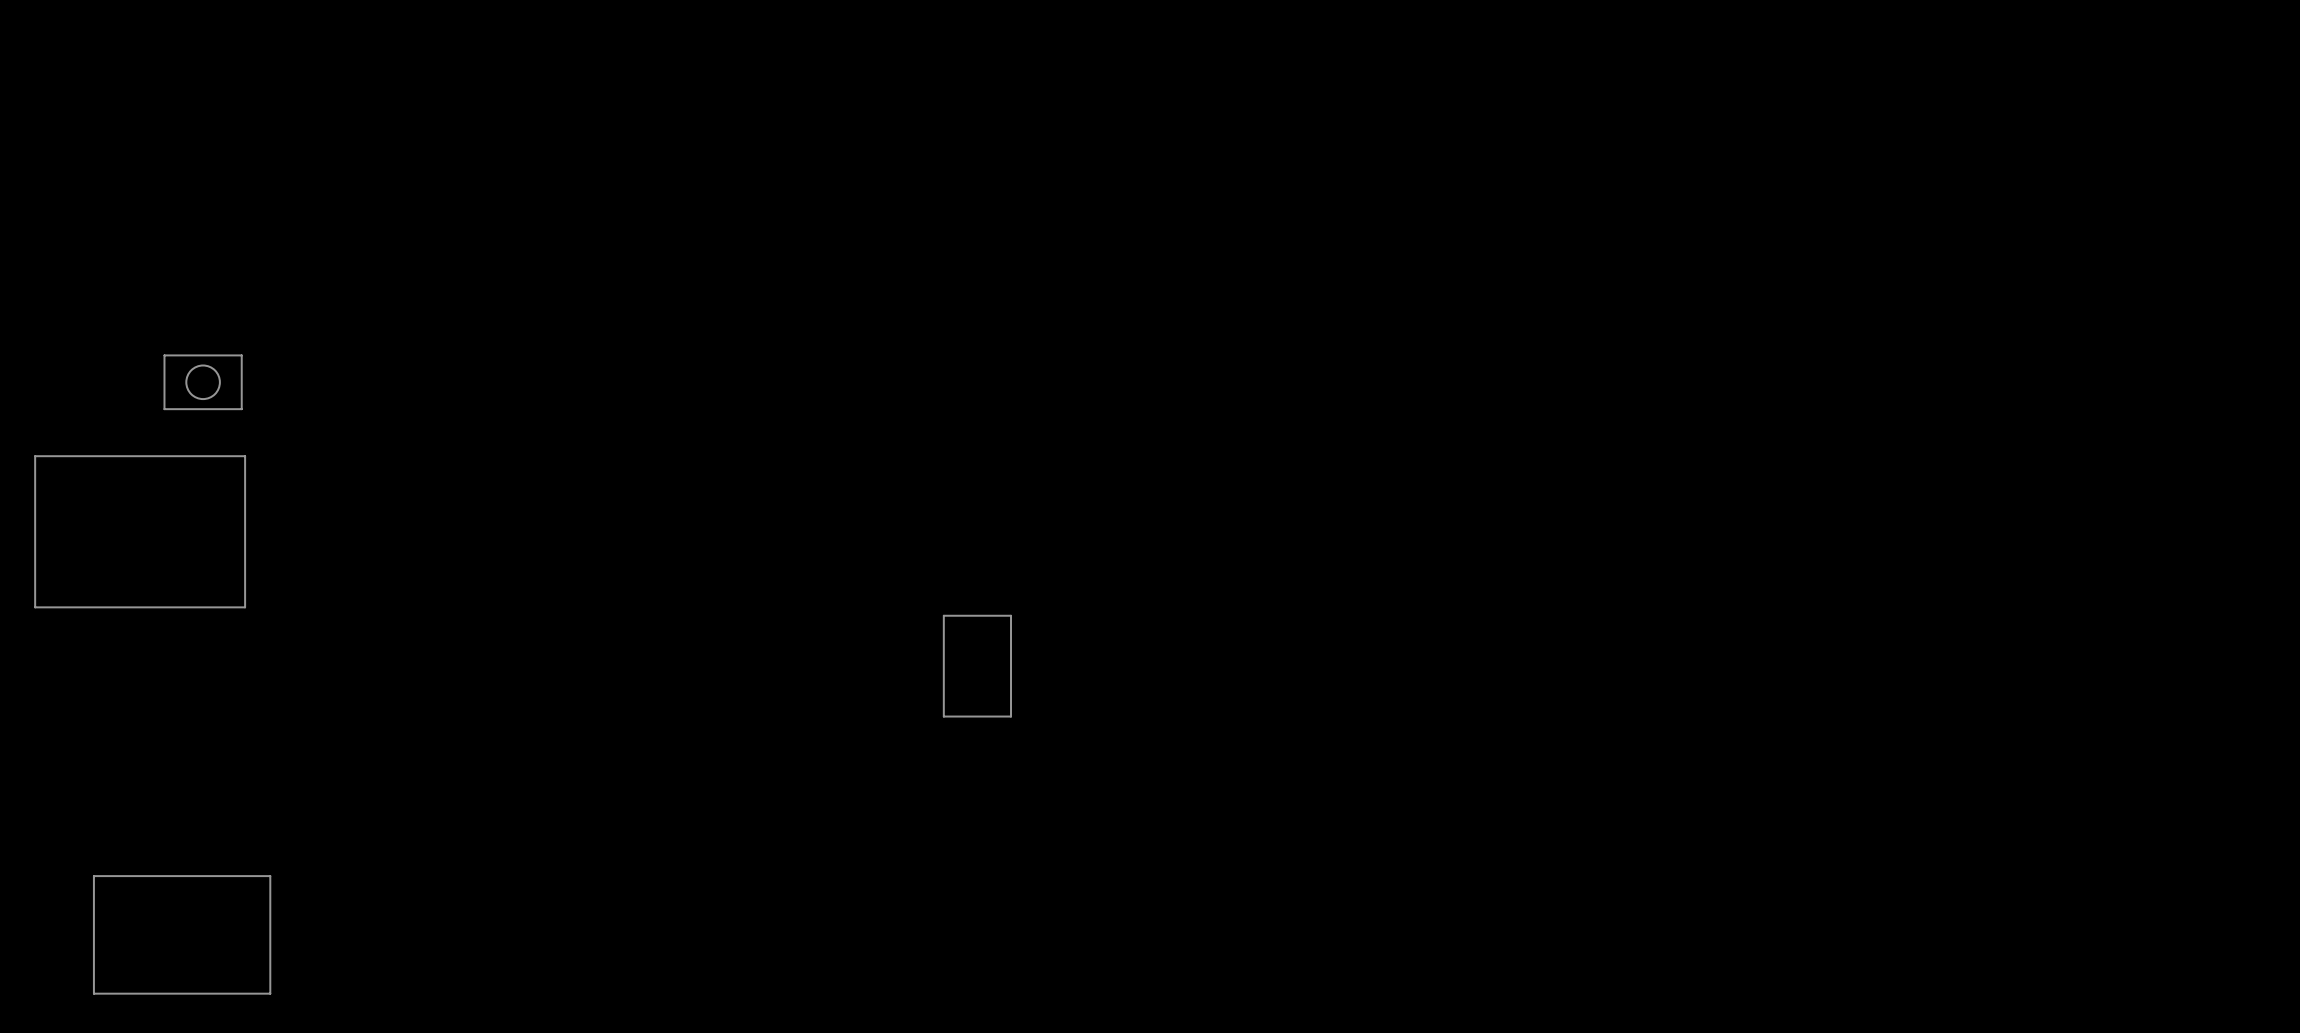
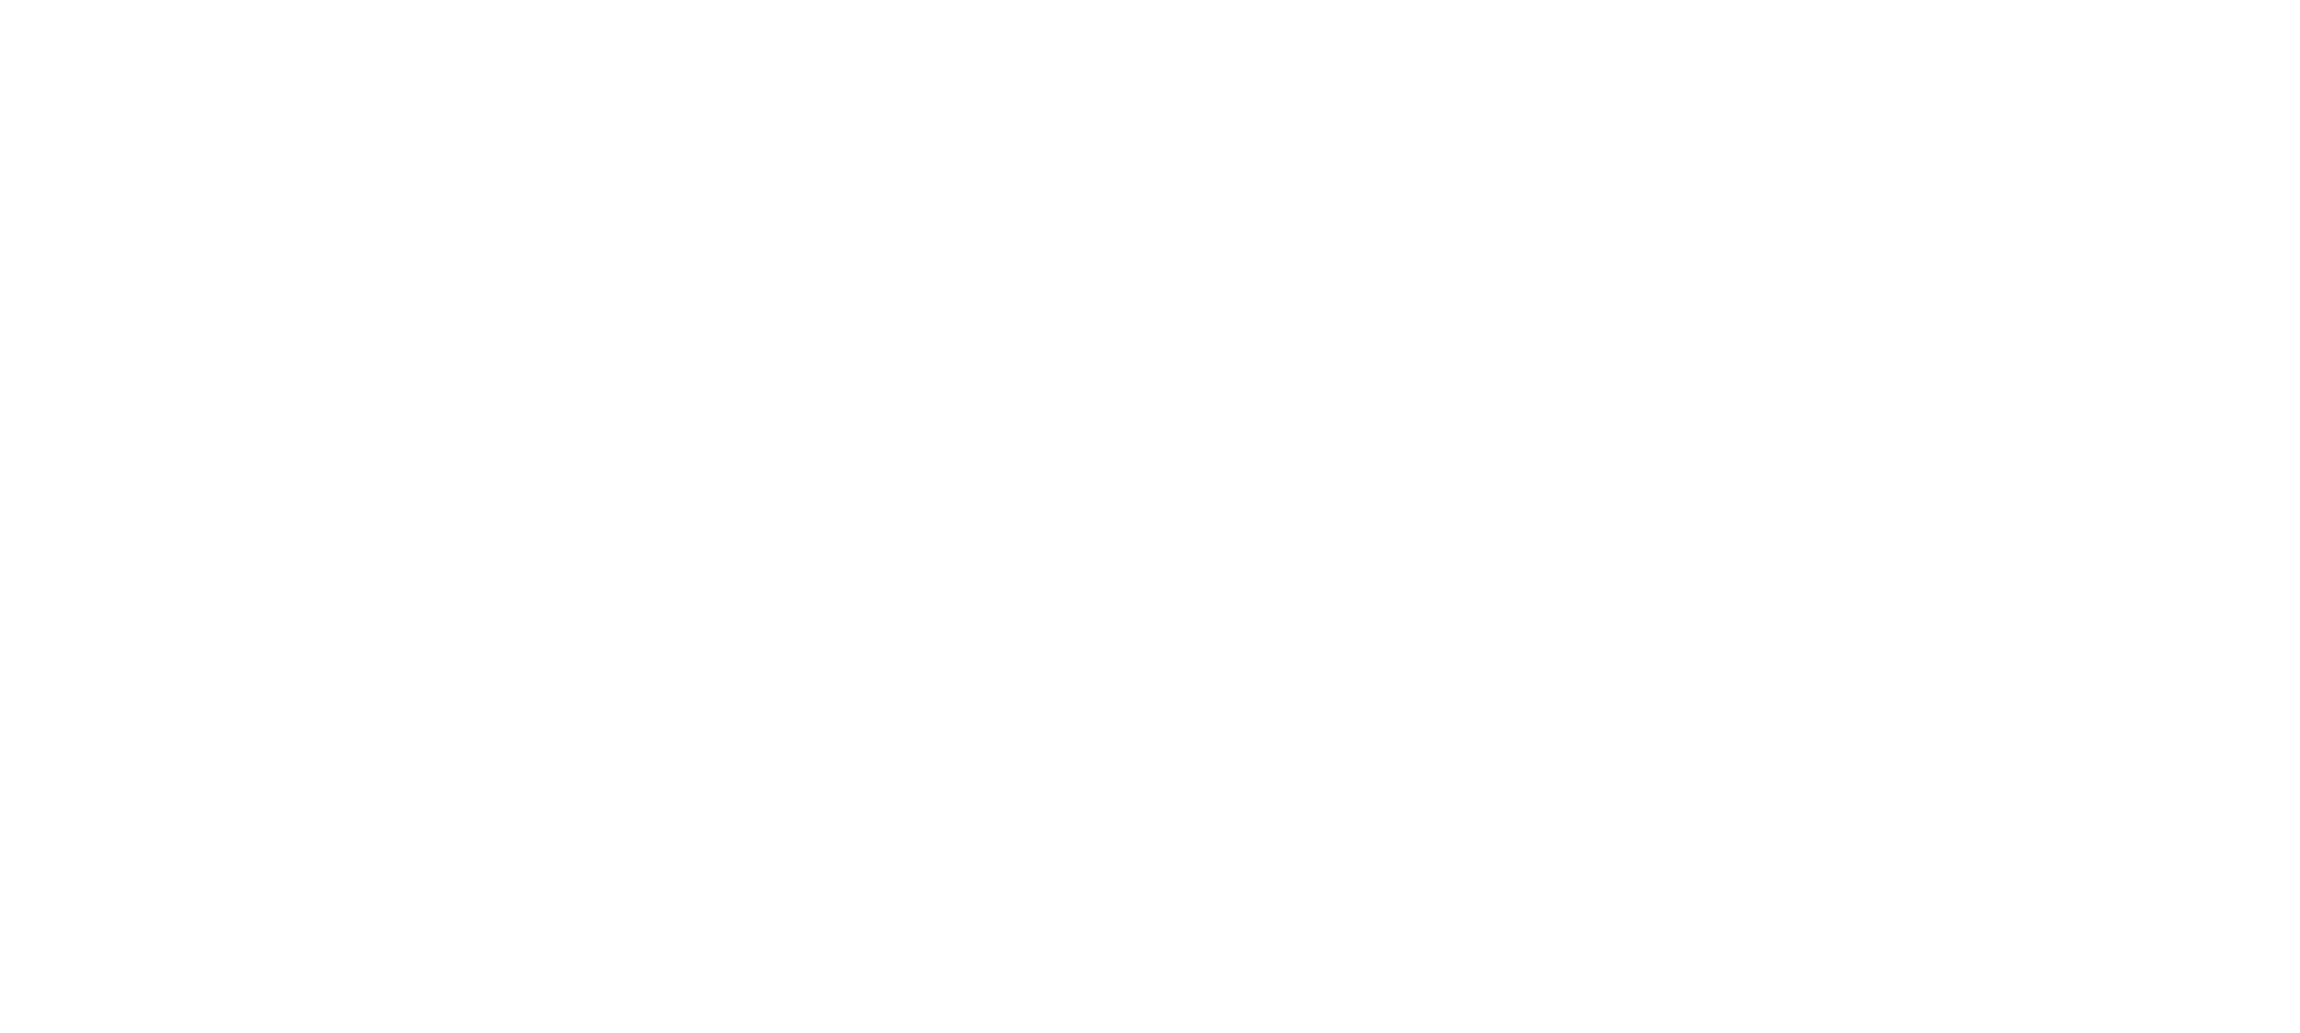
line: (164, 355) (164, 409) (241, 409) (241, 355) (164, 355) -> none
drawing: [185, 364, 221, 401] -> none
line: (35, 456) (35, 607) (245, 607) (245, 456) (35, 456) -> none
line: (943, 615) (943, 716) (1011, 716) (1011, 615) (943, 615) -> none
line: (93, 876) (93, 993) (270, 993) (270, 876) (93, 876) -> none

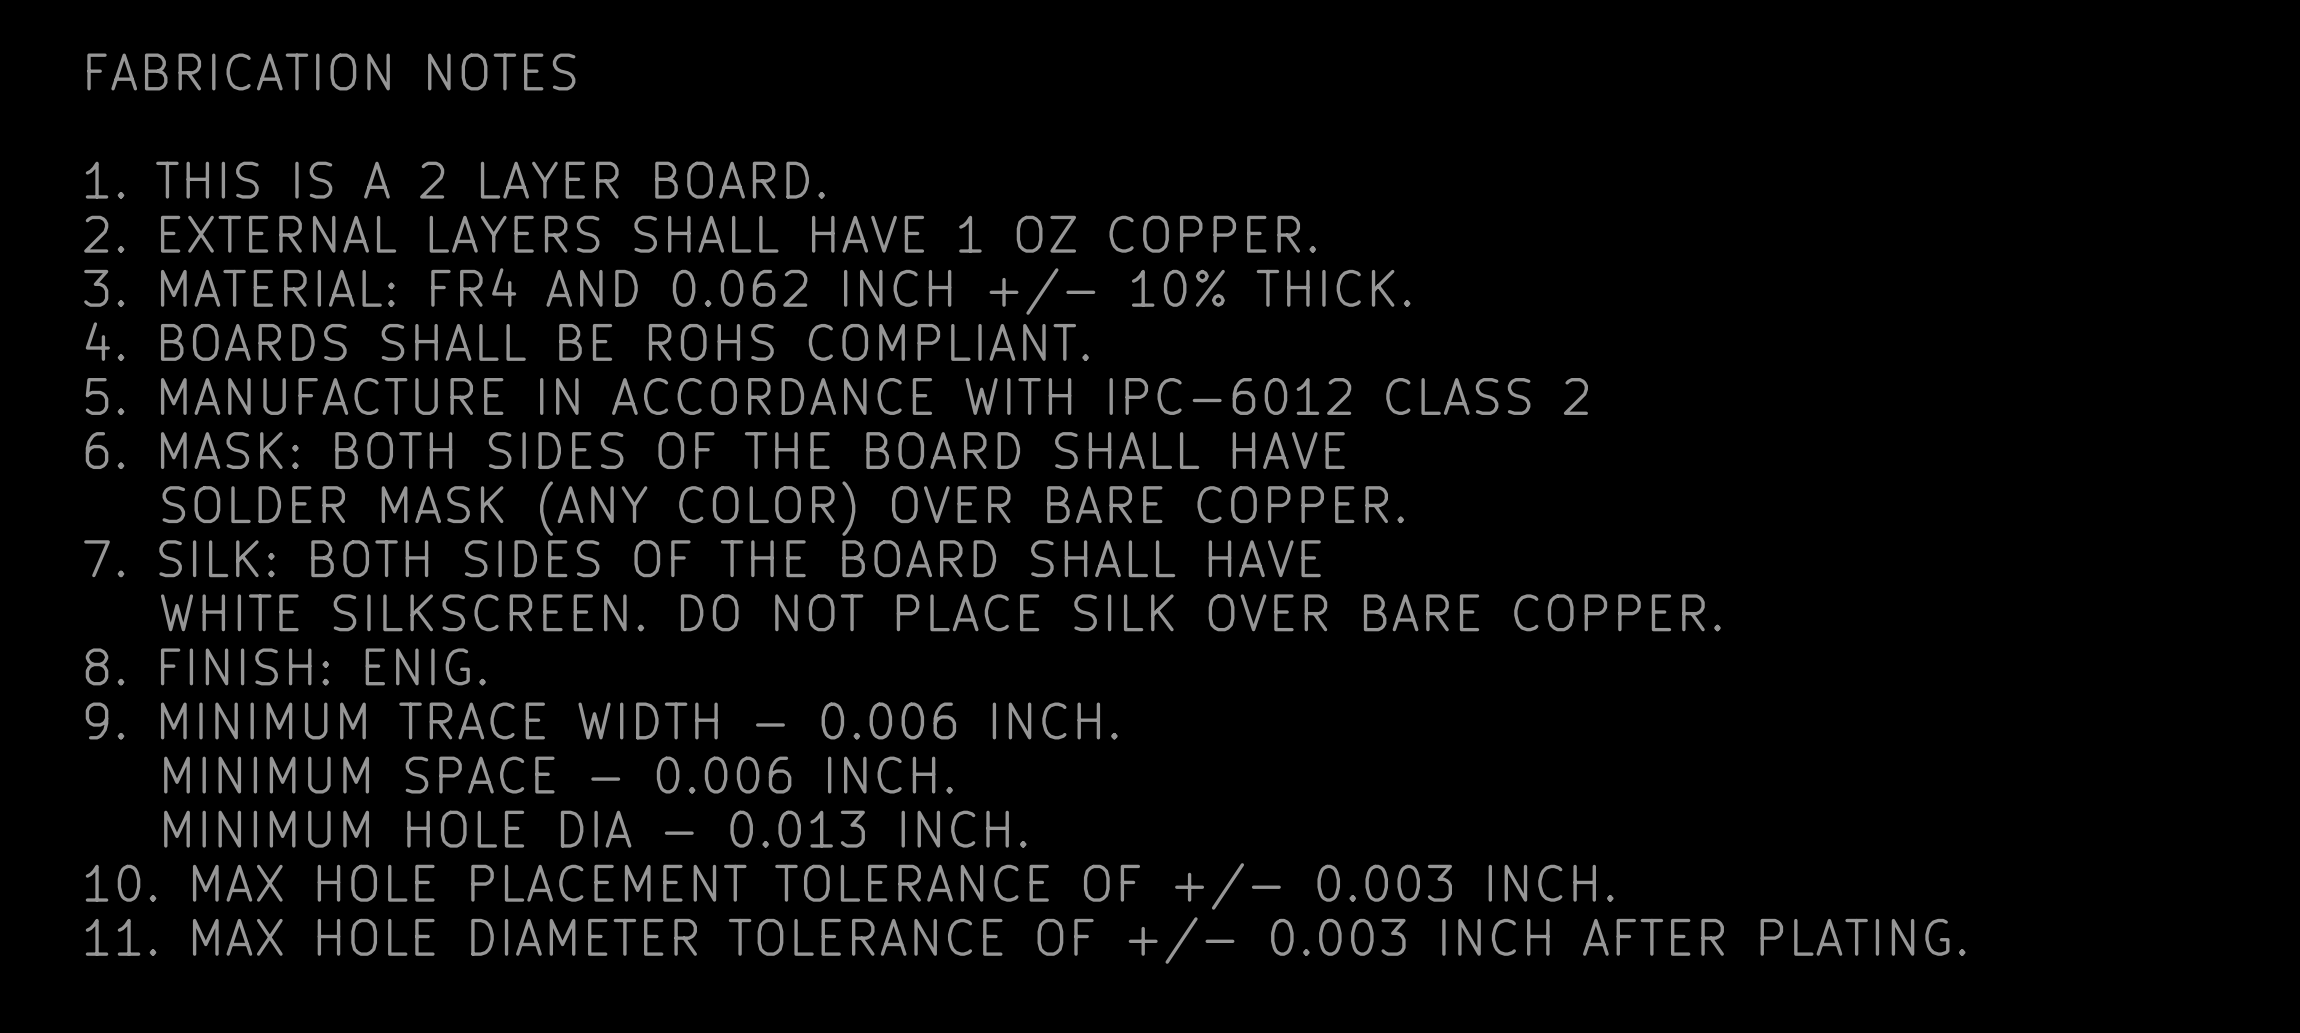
text: none -> FABRICATION NOTES (331, 71)
text: none -> 1. THIS IS A 2 LAYER BOARD. (455, 180)
text: none -> 2. EXTERNAL LAYERS SHALL HAVE 1 OZ COPPER. (700, 234)
text: none -> 3. MATERIAL: FR4 AND 0.062 INCH +/- 10% THICK. (747, 291)
text: none -> 4. BOARDS SHALL BE ROHS COMPLIANT. (587, 341)
text: none -> 5. MANUFACTURE IN ACCORDANCE WITH IPC-6012 CLASS 2 (836, 396)
text: none -> 6. MASK: BOTH SIDES OF THE BOARD SHALL HAVE (715, 450)
text: none -> SOLDER MASK (ANY COLOR) OVER BARE COPPER. (783, 508)
text: none -> 7. SILK: BOTH SIDES OF THE BOARD SHALL HAVE (702, 558)
text: none -> WHITE SILKSCREEN. DO NOT PLACE SILK OVER BARE COPPER. (940, 612)
text: none -> 8. FINISH: ENIG. (285, 666)
text: none -> 9. MINIMUM TRACE WIDTH - 0.006 INCH. (601, 720)
text: none -> MINIMUM SPACE - 0.006 INCH. (558, 775)
text: none -> MINIMUM HOLE DIA - 0.013 INCH. (595, 829)
text: none -> 10. MAX HOLE PLACEMENT TOLERANCE OF +/- 0.003 INCH. (849, 886)
text: none -> 11. MAX HOLE DIAMETER TOLERANCE OF +/- 0.003 INCH AFTER PLATING. (1025, 940)

